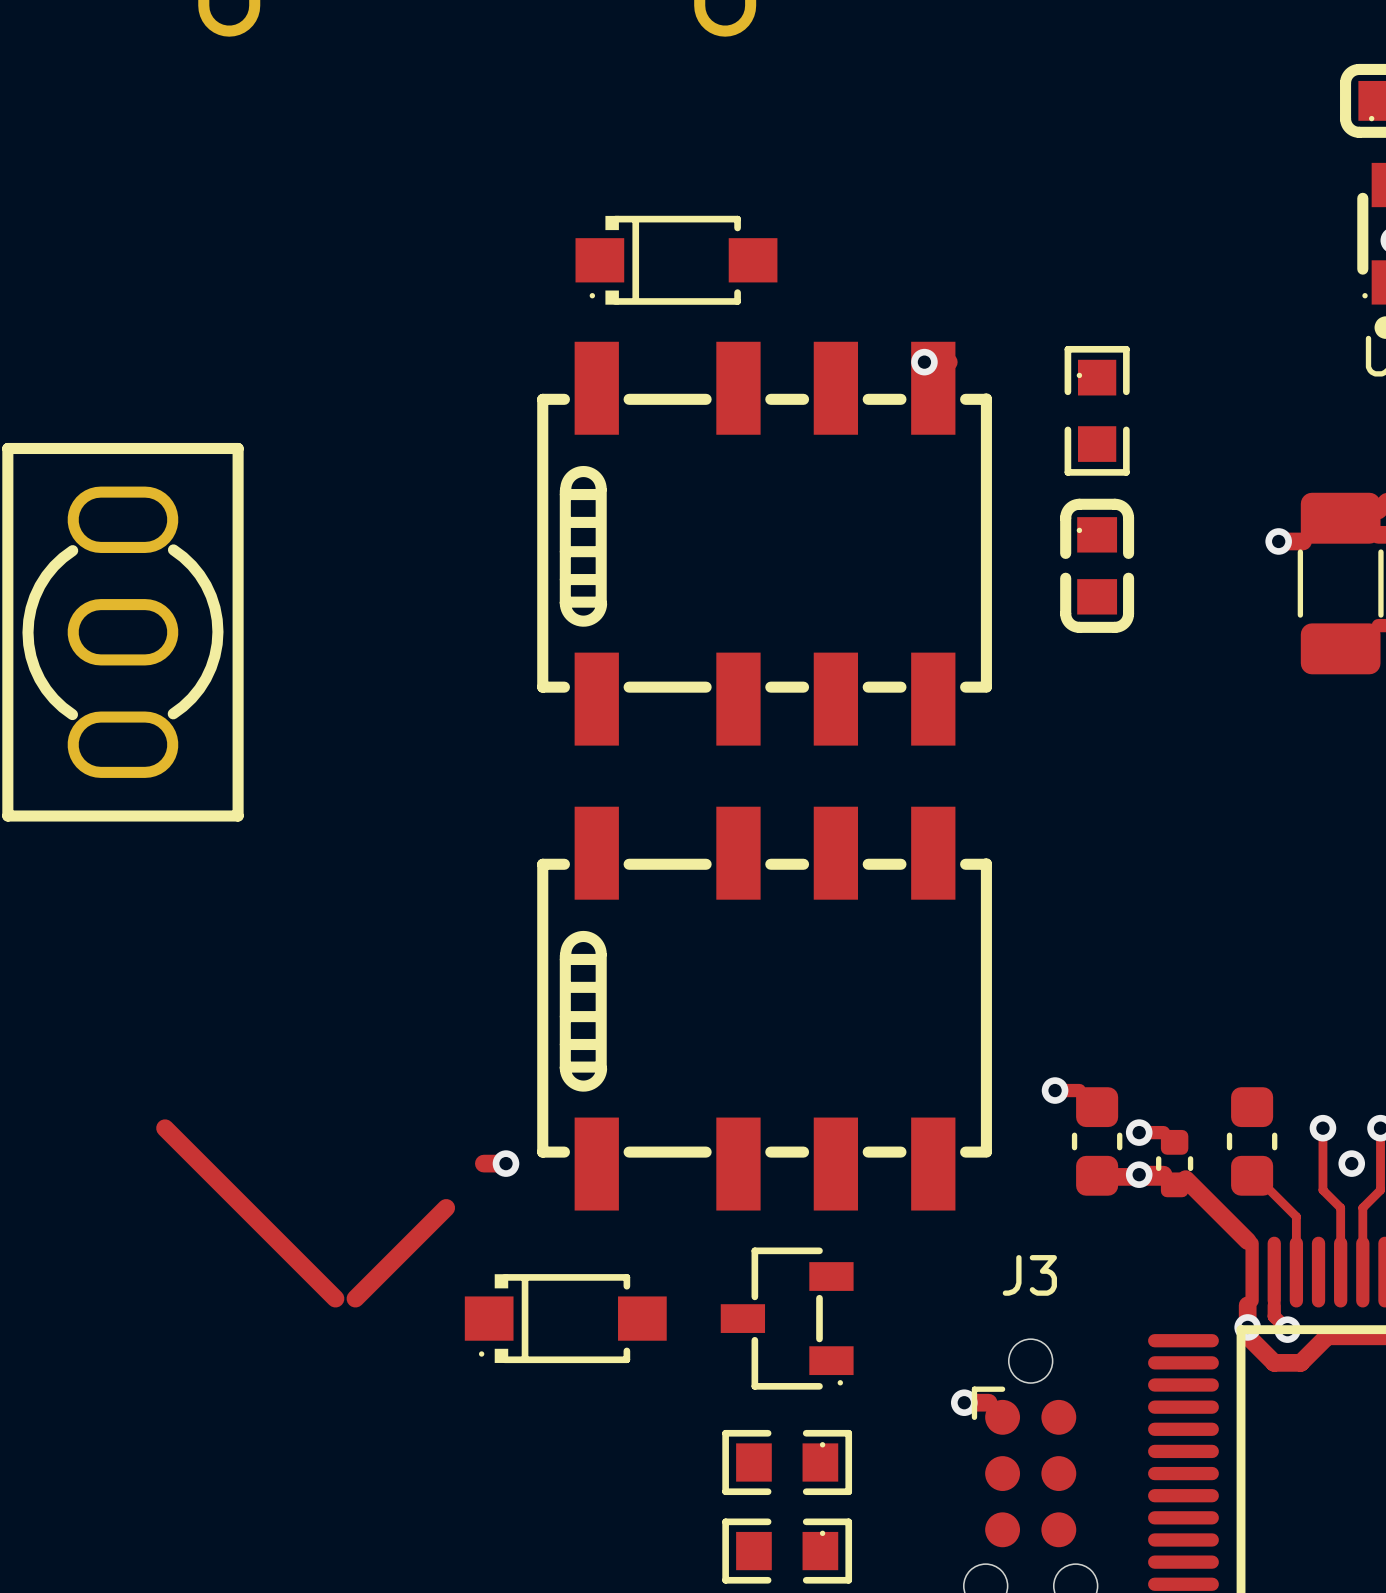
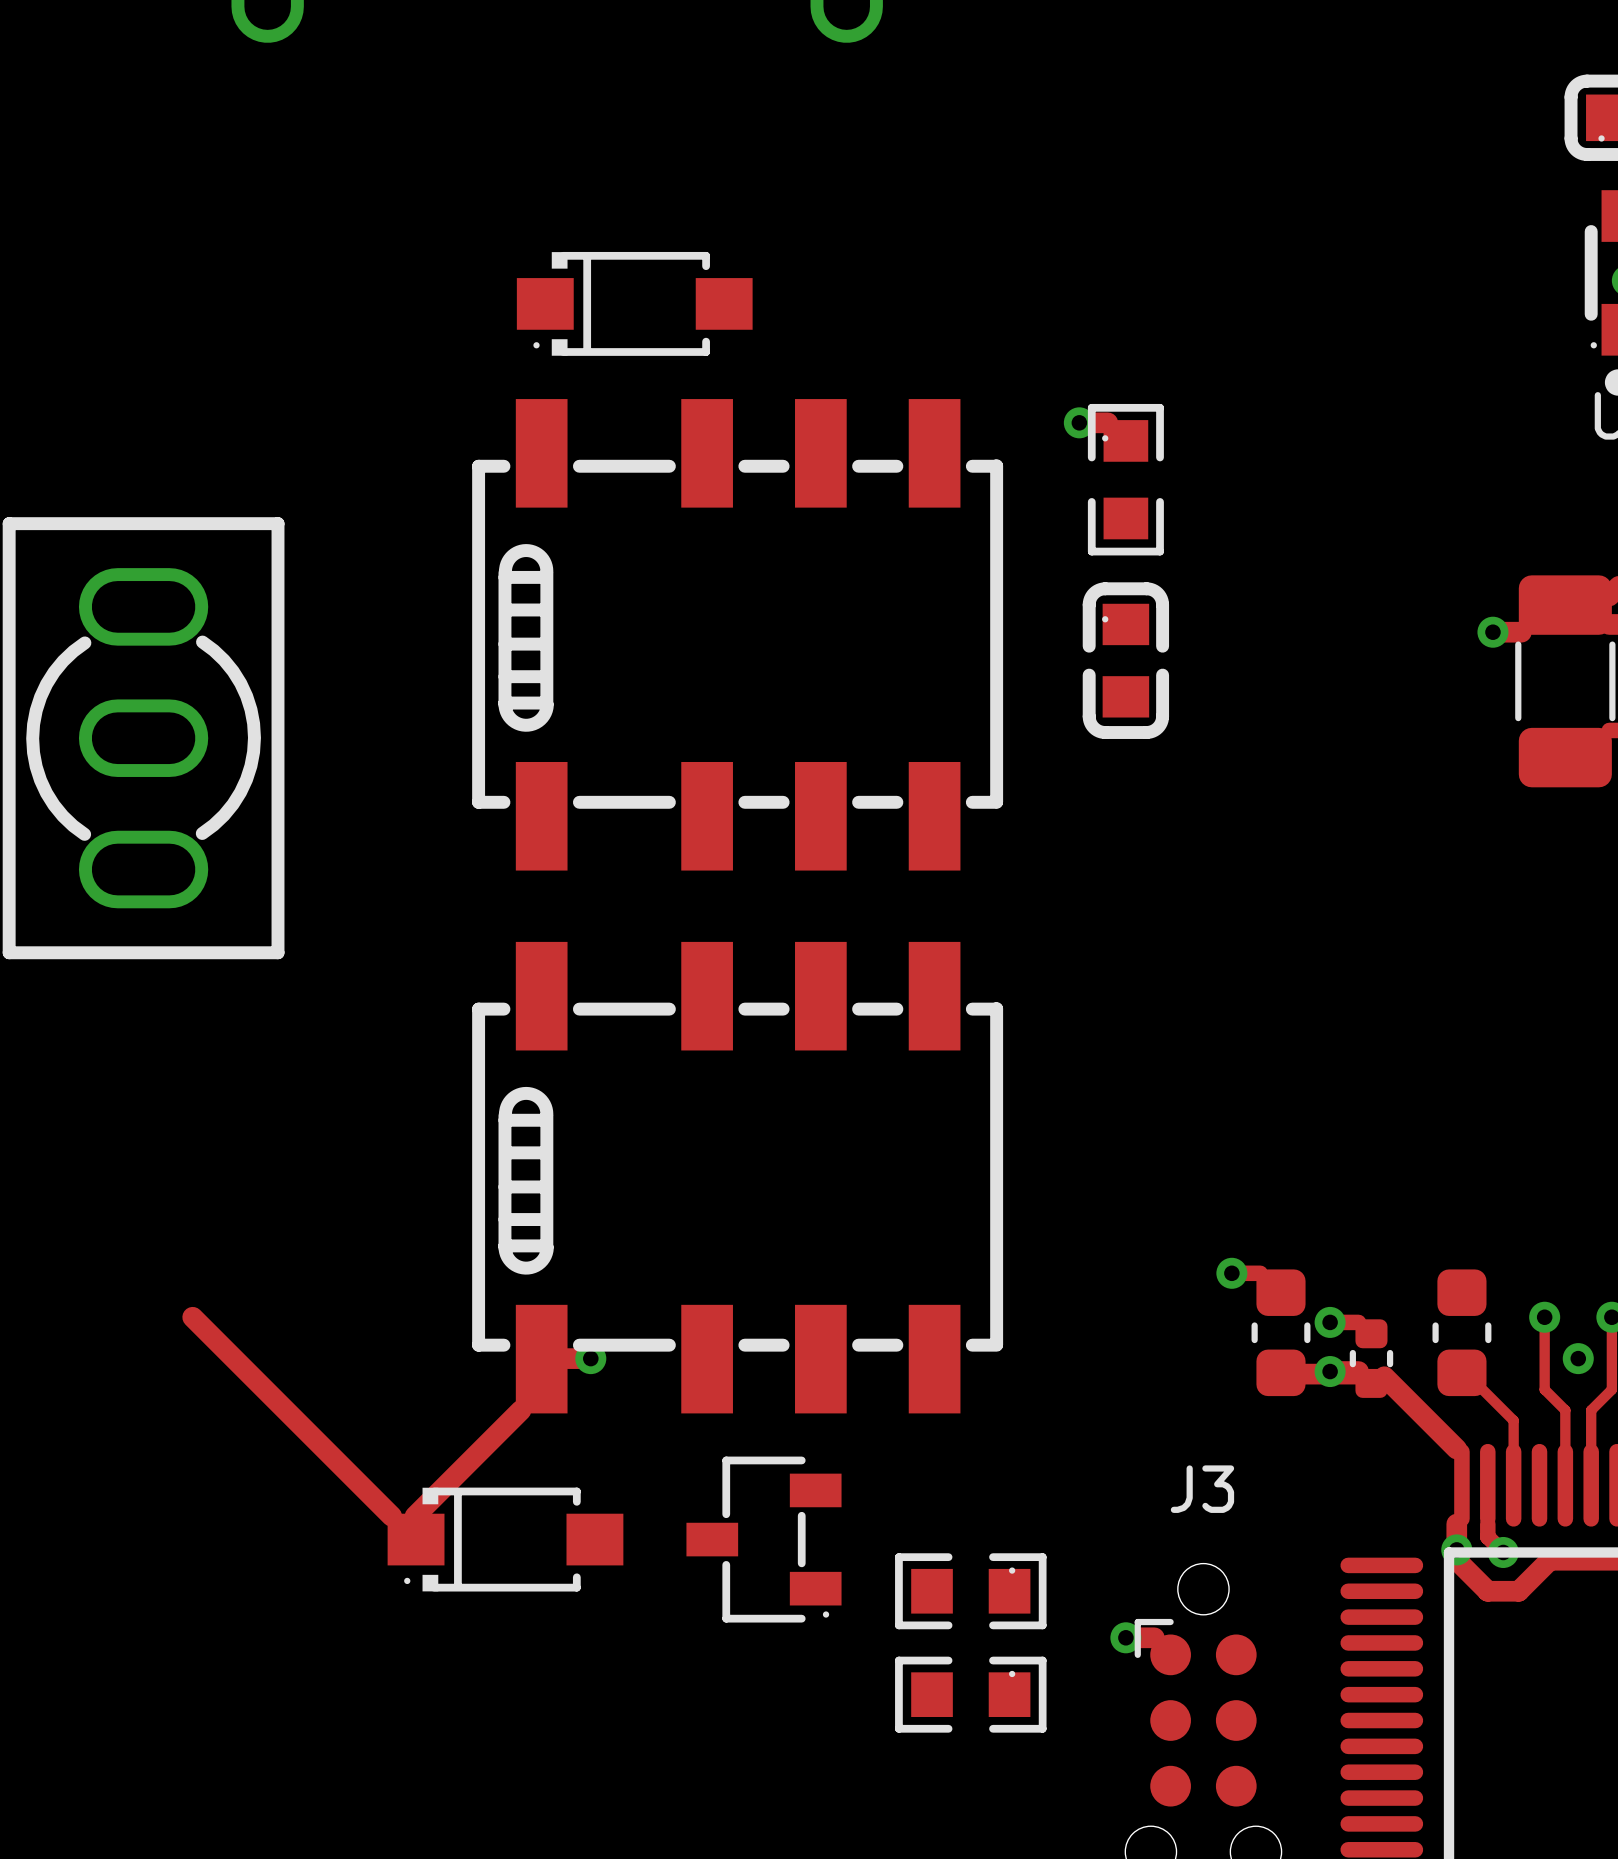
part position: (676, 260) -> (634, 303)
part position: (1097, 410) -> (1125, 479)
part position: (764, 543) -> (737, 634)
part position: (1097, 565) -> (1125, 660)
part position: (764, 1008) -> (737, 1177)
part position: (565, 1318) -> (505, 1539)
part position: (787, 1318) -> (763, 1539)
part: none -> (970, 1591)
part position: (787, 1462) -> (970, 1694)
part: (787, 1551) -> none

